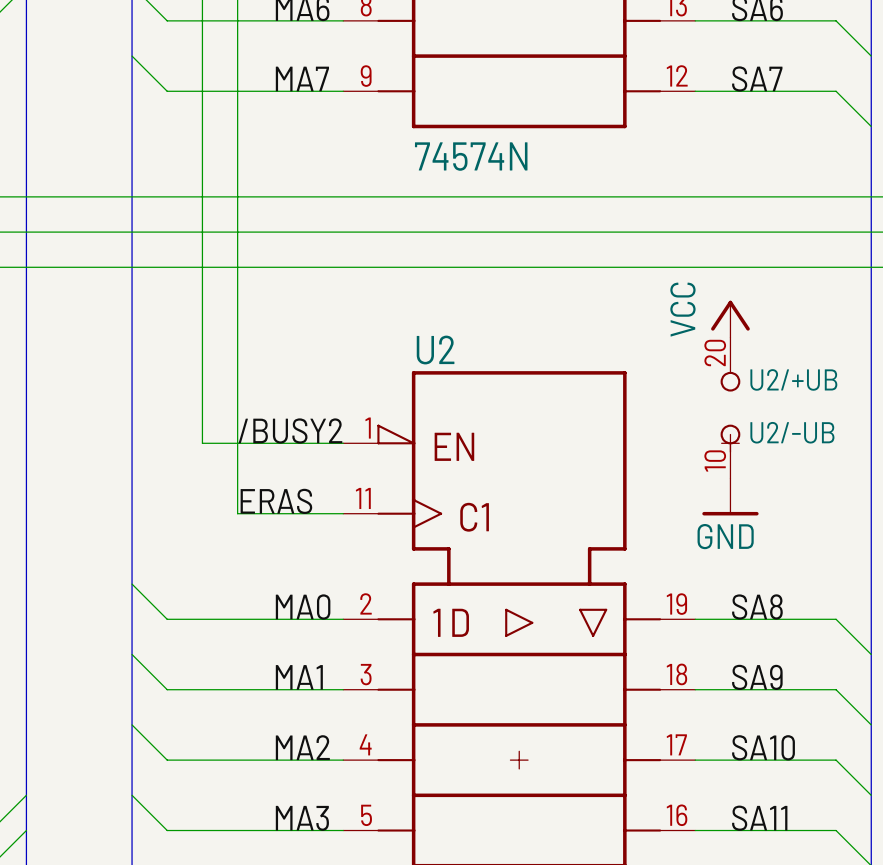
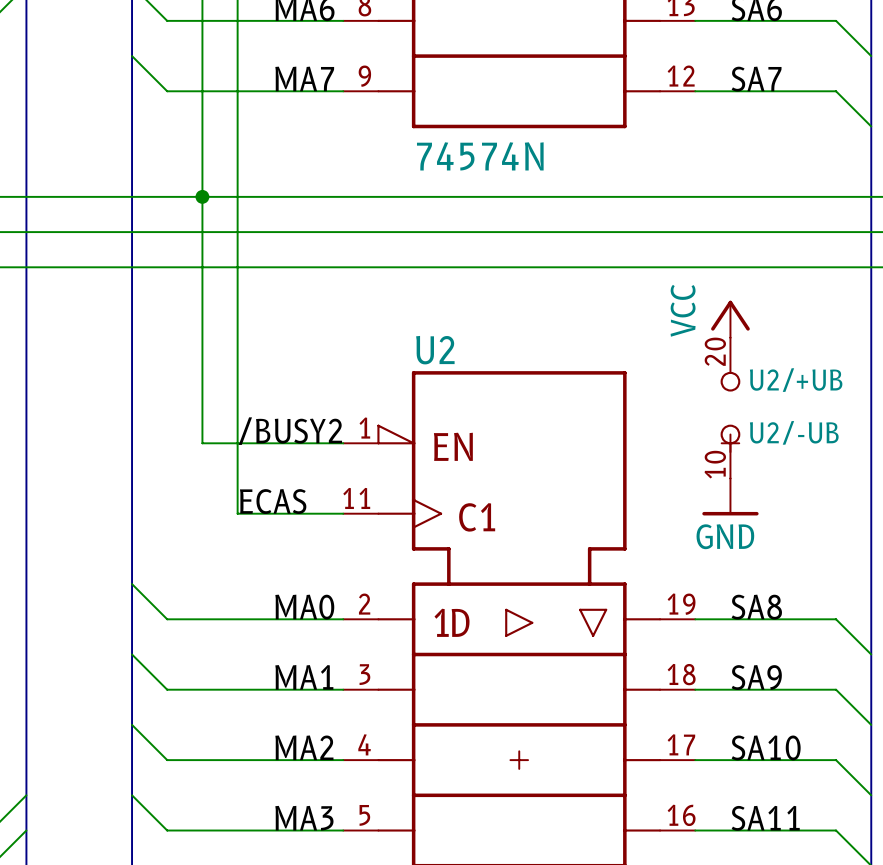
junction: none -> (202, 196)
label: ERAS (276, 501) -> ECAS (273, 501)

